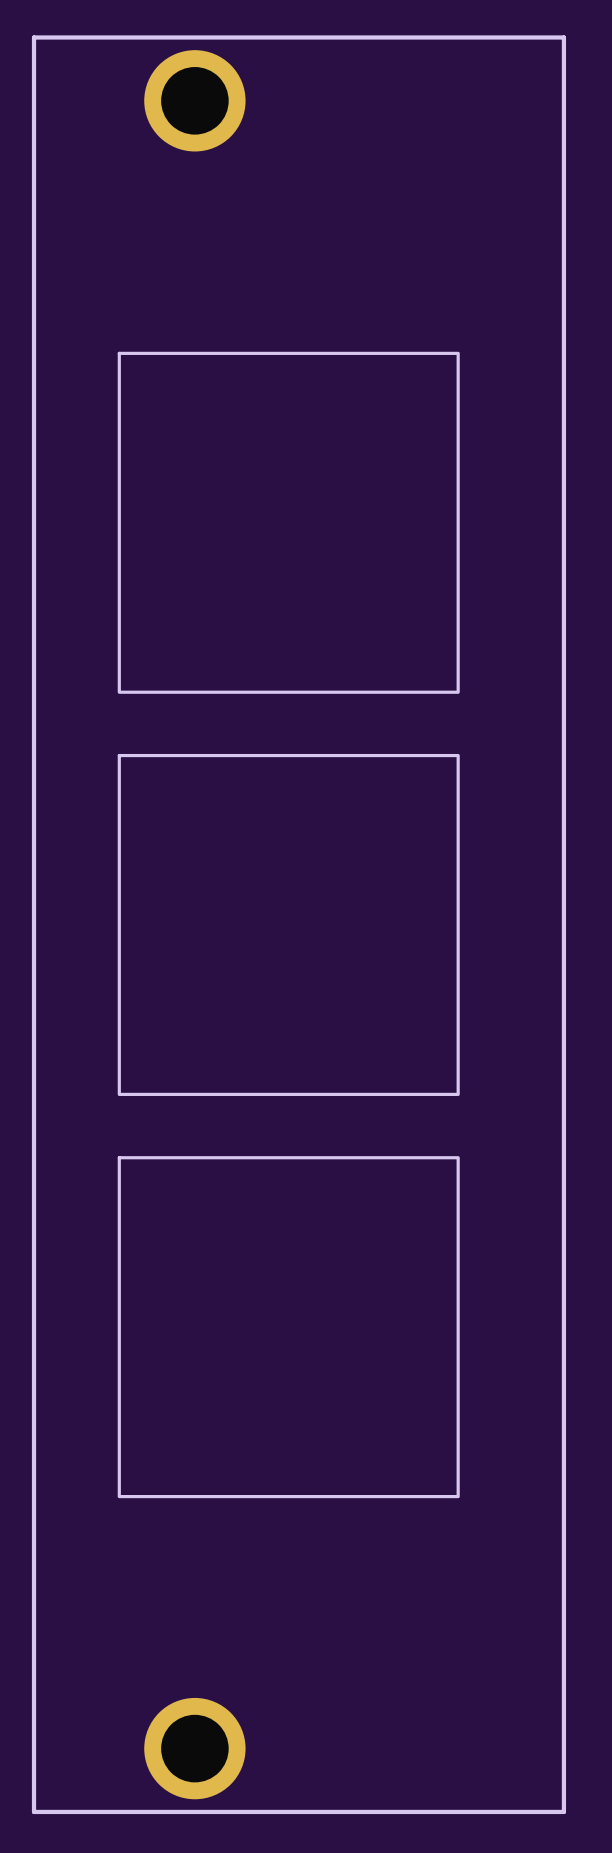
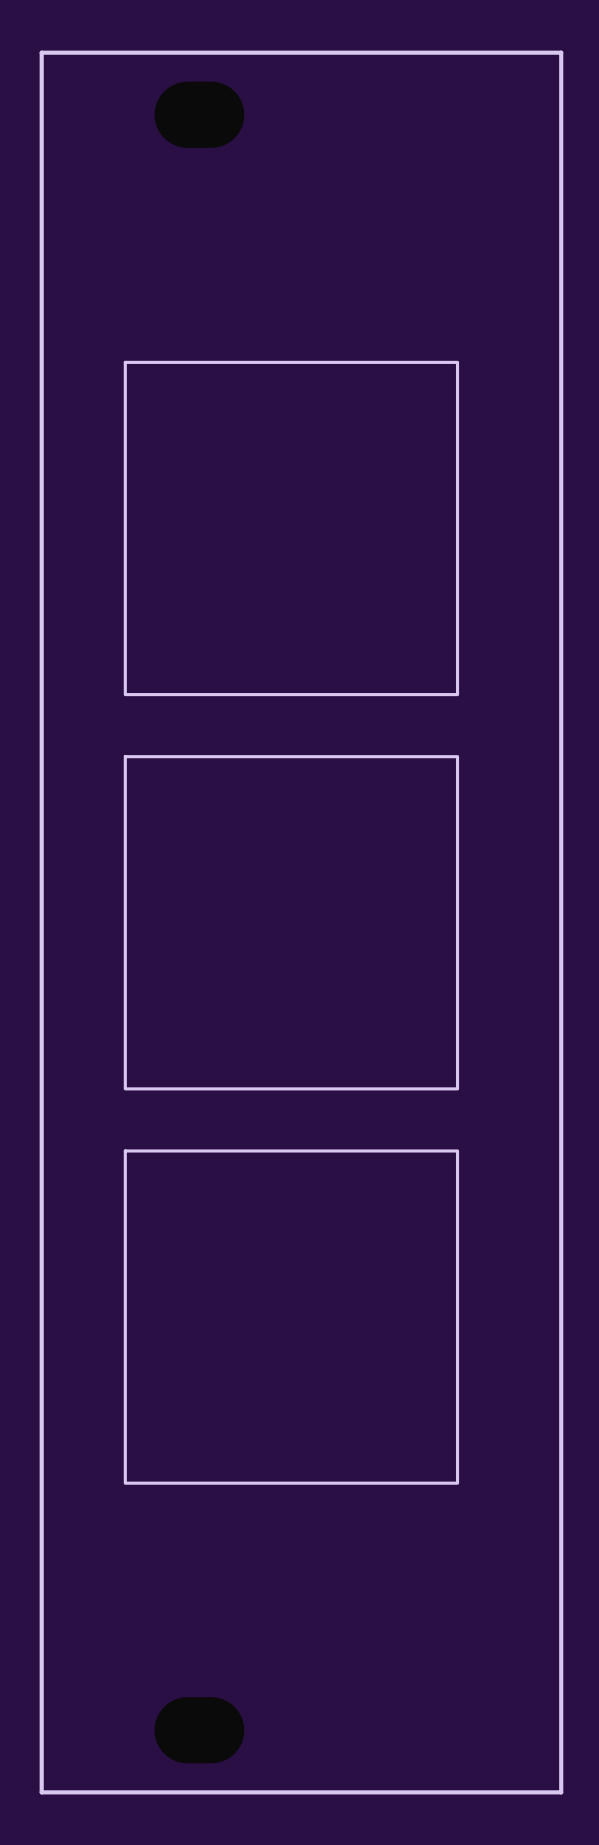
part footprint: [144, 50, 246, 152] -> [154, 81, 245, 148]
part footprint: [144, 1697, 246, 1800] -> [154, 1697, 245, 1764]

